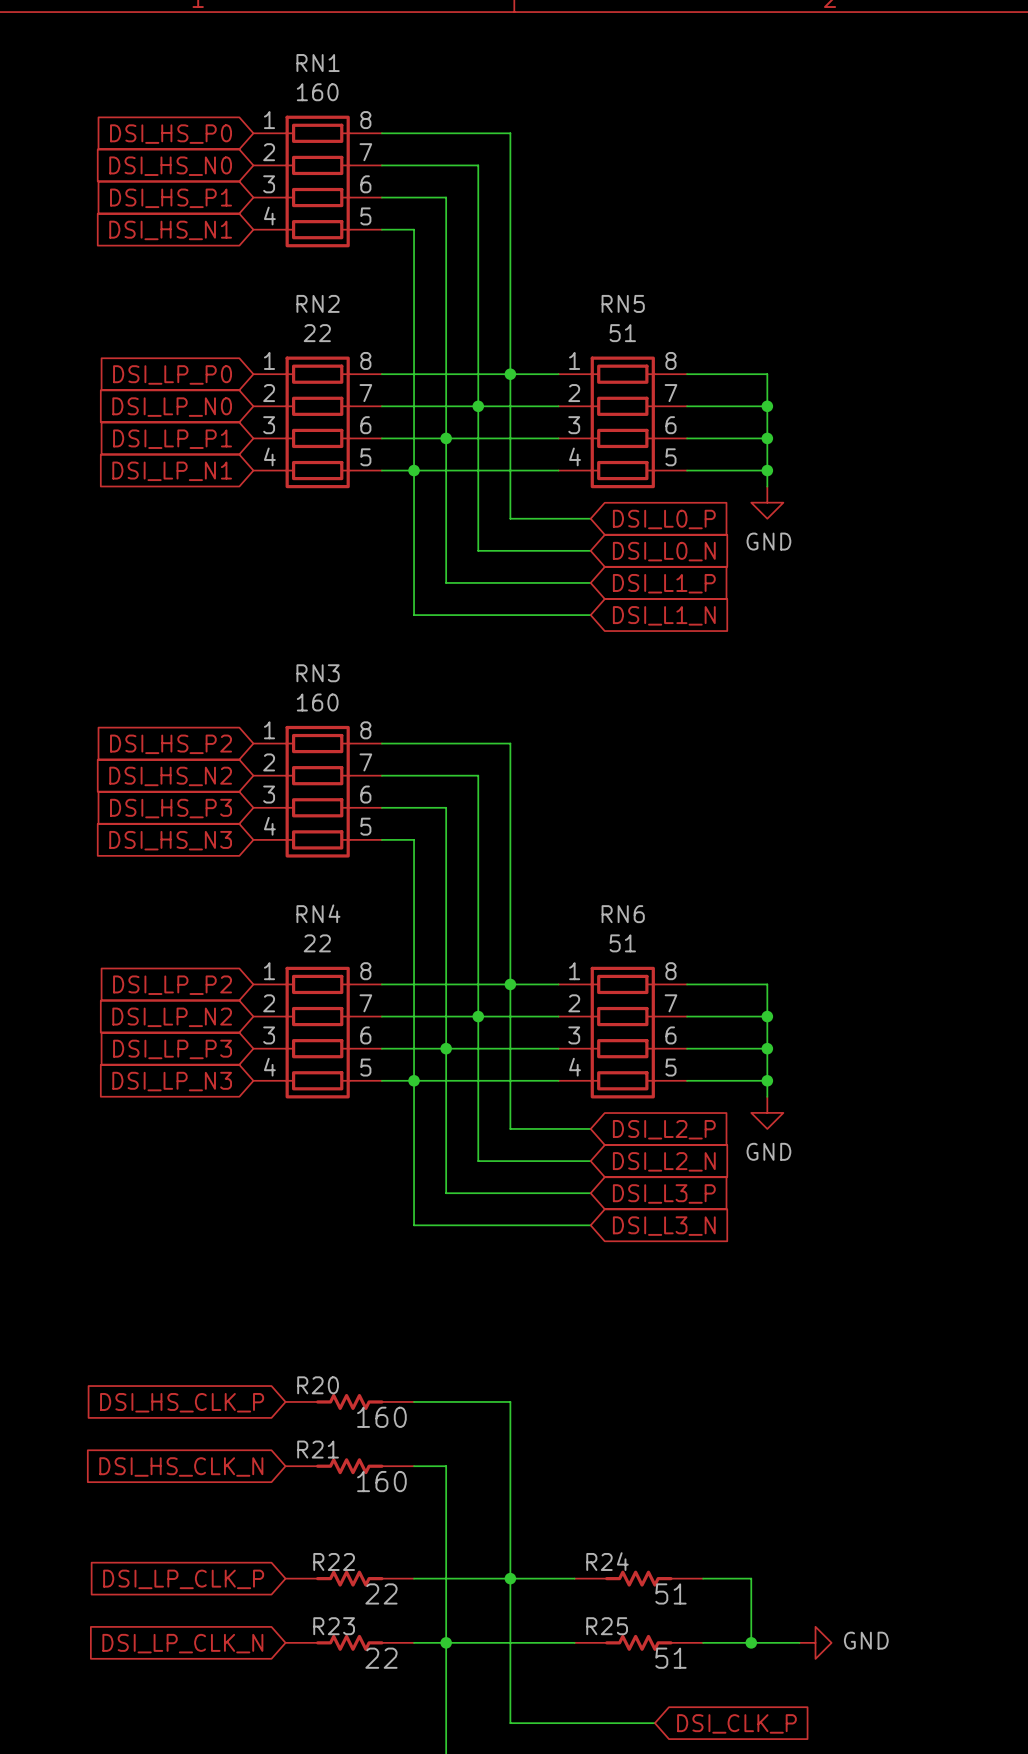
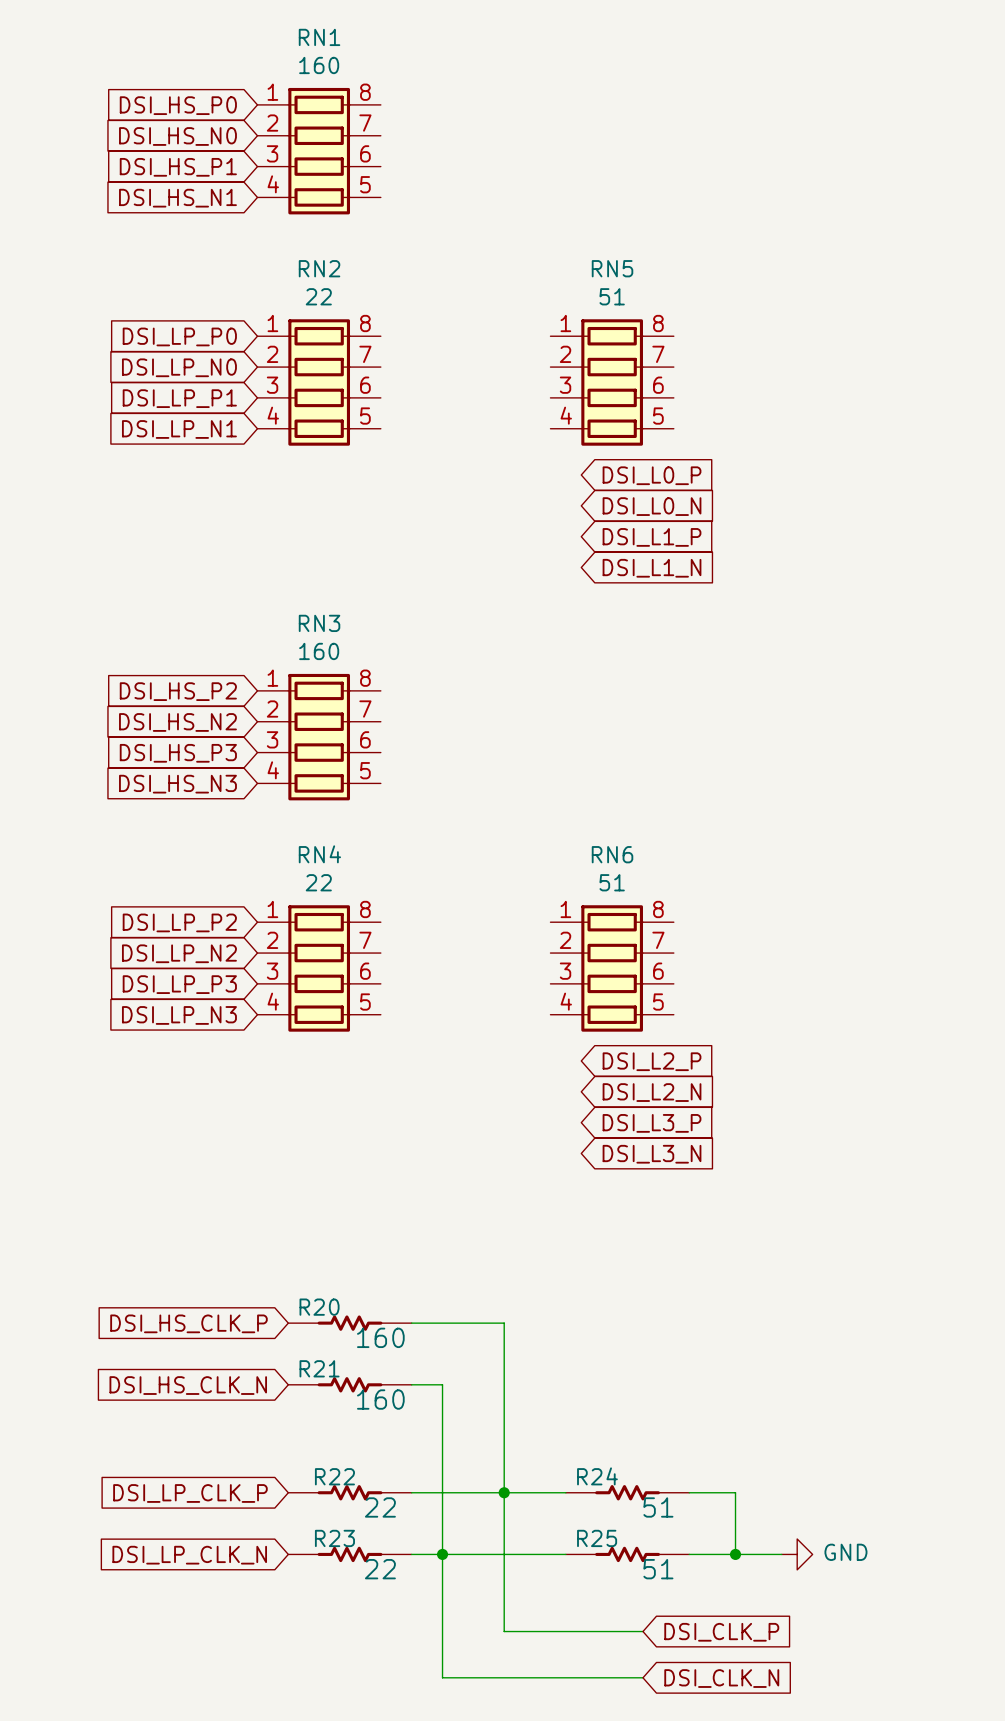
wire: (381, 133) (510, 133) (510, 518) (590, 518) -> none
wire: (381, 165) (478, 165) (478, 550) (590, 550) -> none
wire: (381, 197) (446, 197) (446, 582) (590, 582) -> none
wire: (381, 229) (414, 229) (414, 615) (590, 615) -> none
wire: (381, 374) (558, 374) -> none
junction: (510, 374) -> none
wire: (687, 374) (767, 374) (767, 486) -> none
wire: (381, 406) (558, 406) -> none
junction: (478, 406) -> none
wire: (687, 406) (767, 406) -> none
junction: (767, 406) -> none
wire: (381, 438) (558, 438) -> none
junction: (446, 438) -> none
wire: (687, 438) (767, 438) -> none
junction: (767, 438) -> none
wire: (381, 470) (558, 470) -> none
junction: (414, 470) -> none
wire: (687, 470) (767, 470) -> none
junction: (767, 470) -> none
power symbol: GND (767, 502) -> none
wire: (381, 743) (510, 743) (510, 1128) (590, 1128) -> none
wire: (381, 775) (478, 775) (478, 1161) (590, 1161) -> none
wire: (381, 807) (446, 807) (446, 1193) (590, 1193) -> none
wire: (381, 839) (414, 839) (414, 1225) (590, 1225) -> none
wire: (381, 984) (558, 984) -> none
junction: (510, 984) -> none
wire: (687, 984) (767, 984) (767, 1096) -> none
wire: (381, 1016) (558, 1016) -> none
junction: (478, 1016) -> none
wire: (687, 1016) (767, 1016) -> none
junction: (767, 1016) -> none
wire: (381, 1048) (558, 1048) -> none
junction: (446, 1048) -> none
wire: (687, 1048) (767, 1048) -> none
junction: (767, 1048) -> none
wire: (381, 1080) (558, 1080) -> none
junction: (414, 1080) -> none
wire: (687, 1080) (767, 1080) -> none
junction: (767, 1080) -> none
power symbol: GND (767, 1112) -> none

